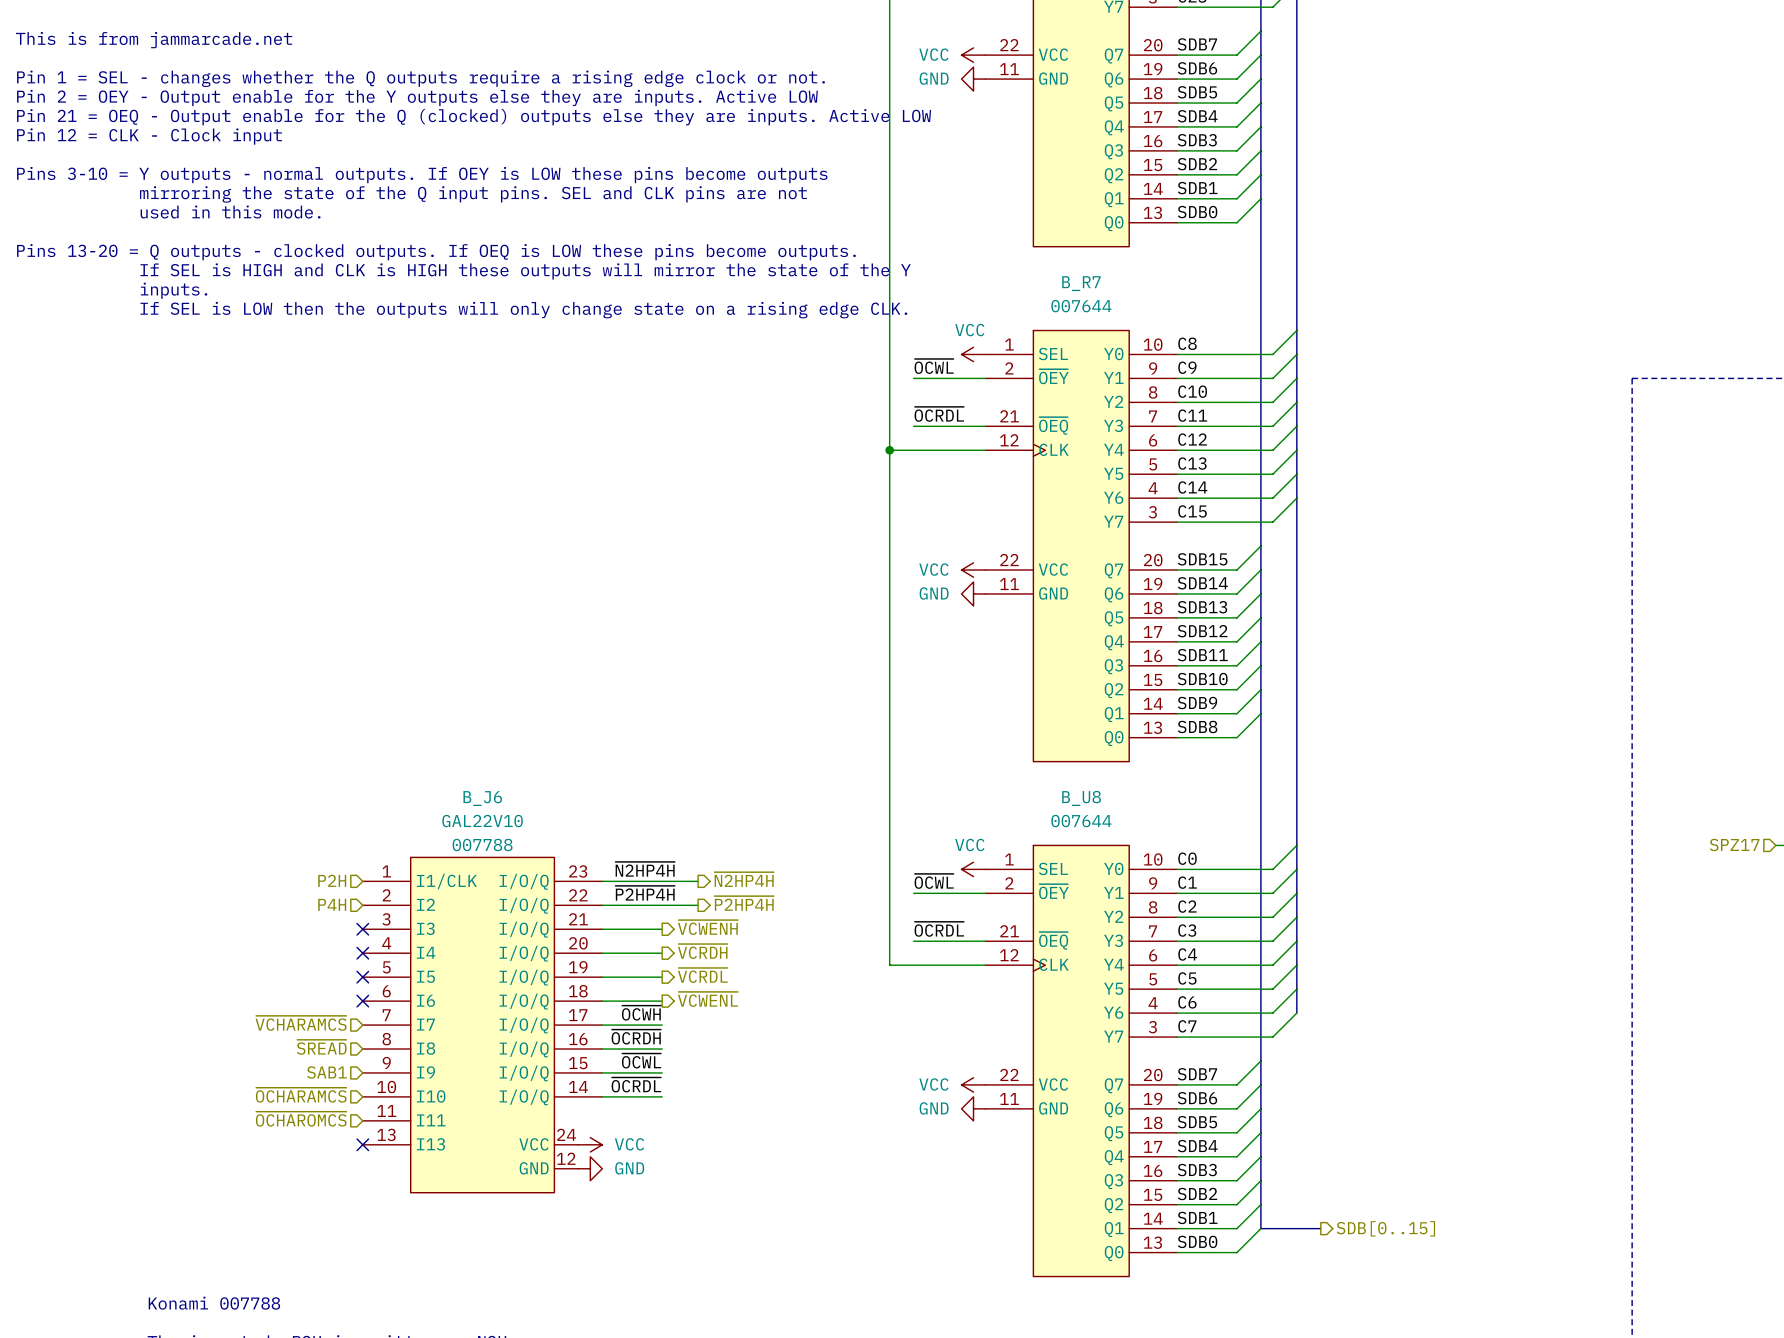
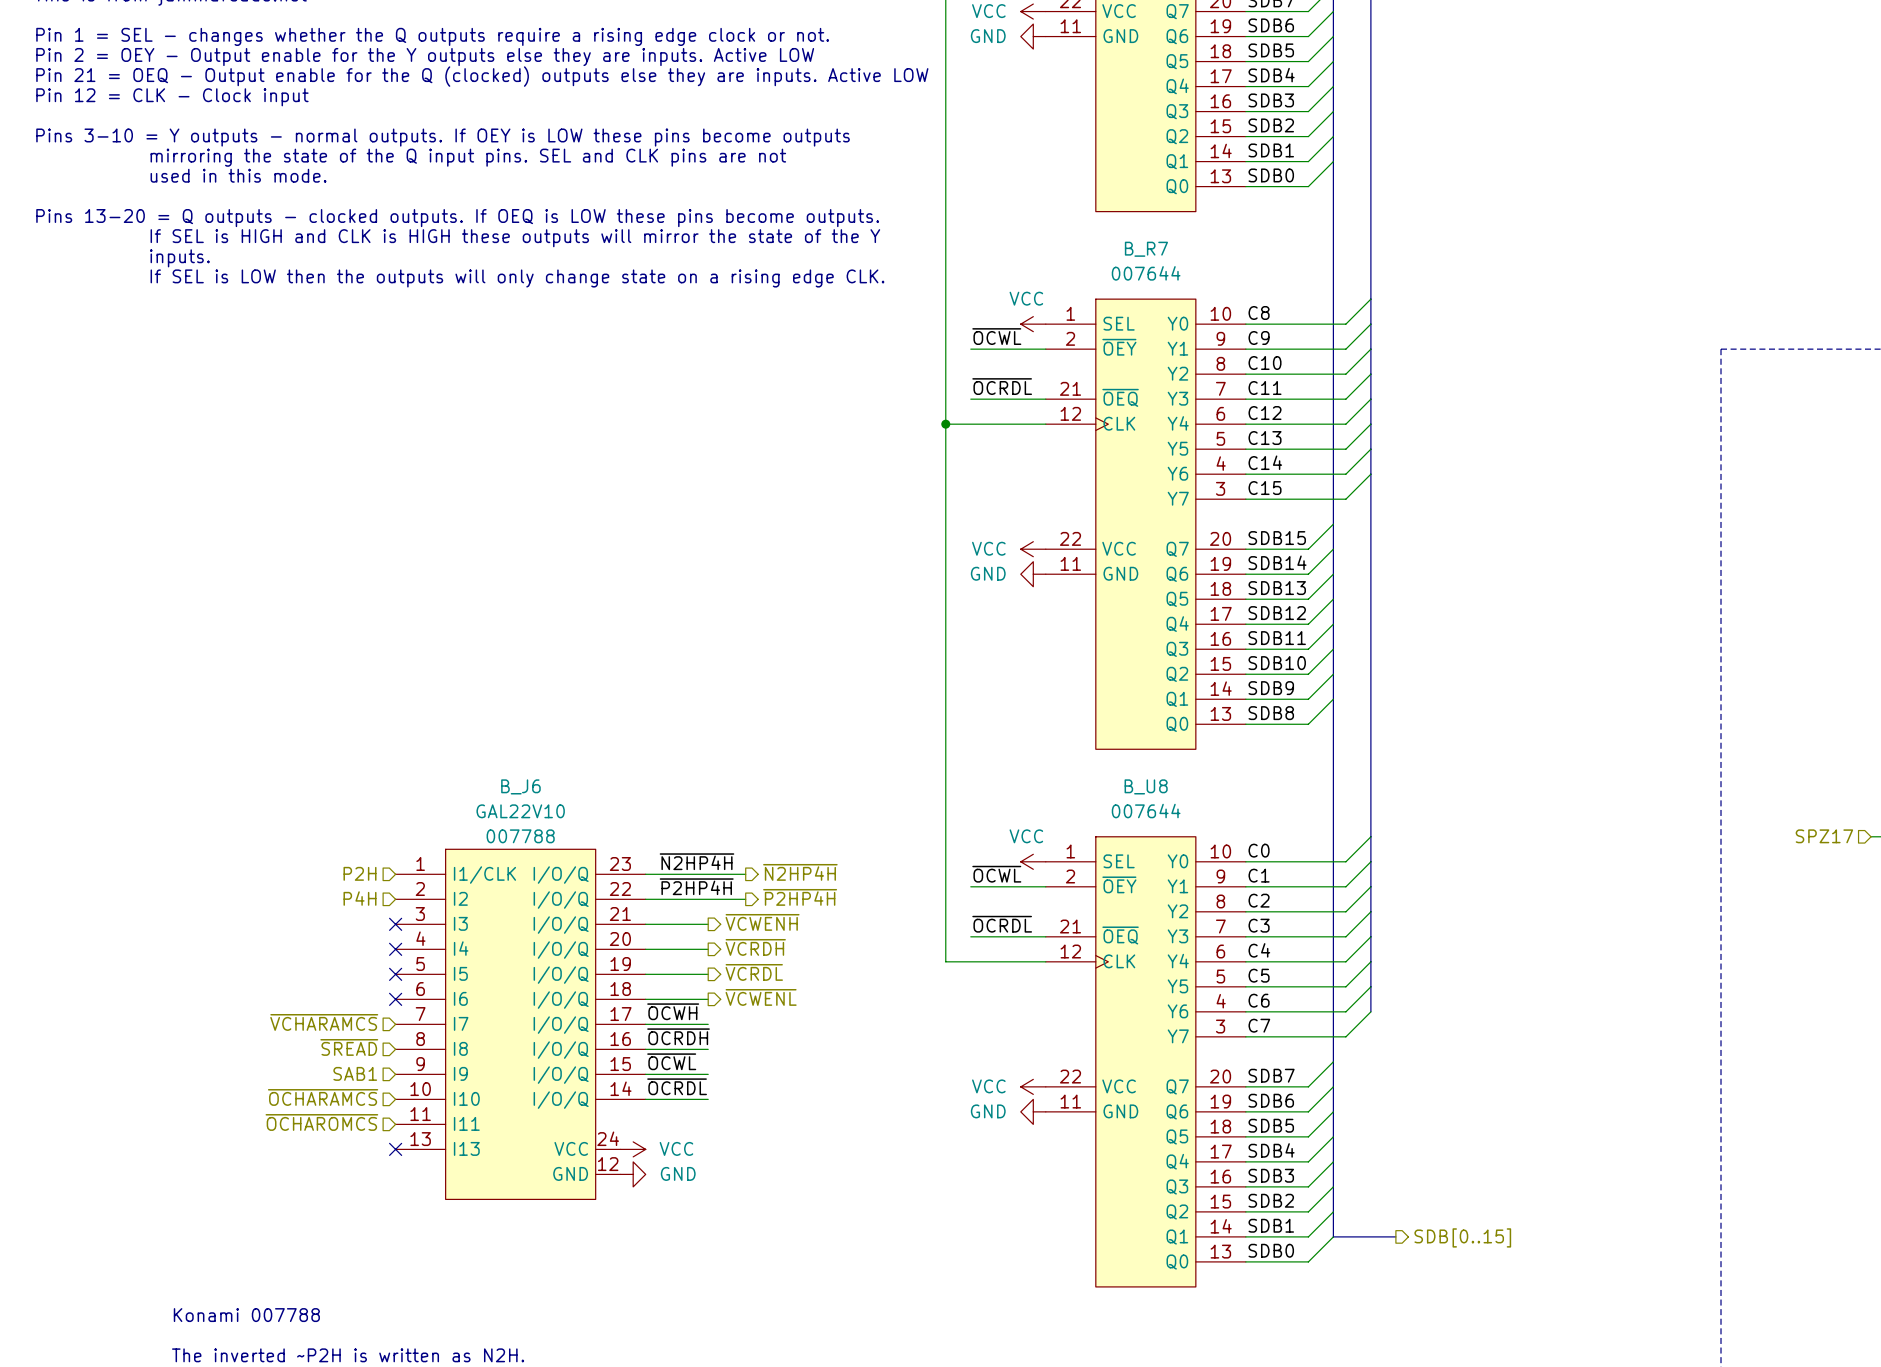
label position: ~{OCWH} (641, 1013) -> ~{OCWH} (673, 1011)
label position: ~{OCRDH} (636, 1037) -> ~{OCRDH} (678, 1036)
label position: ~{OCWL} (641, 1061) -> ~{OCWL} (671, 1061)
label position: ~{OCRDL} (636, 1084) -> ~{OCRDL} (677, 1086)

